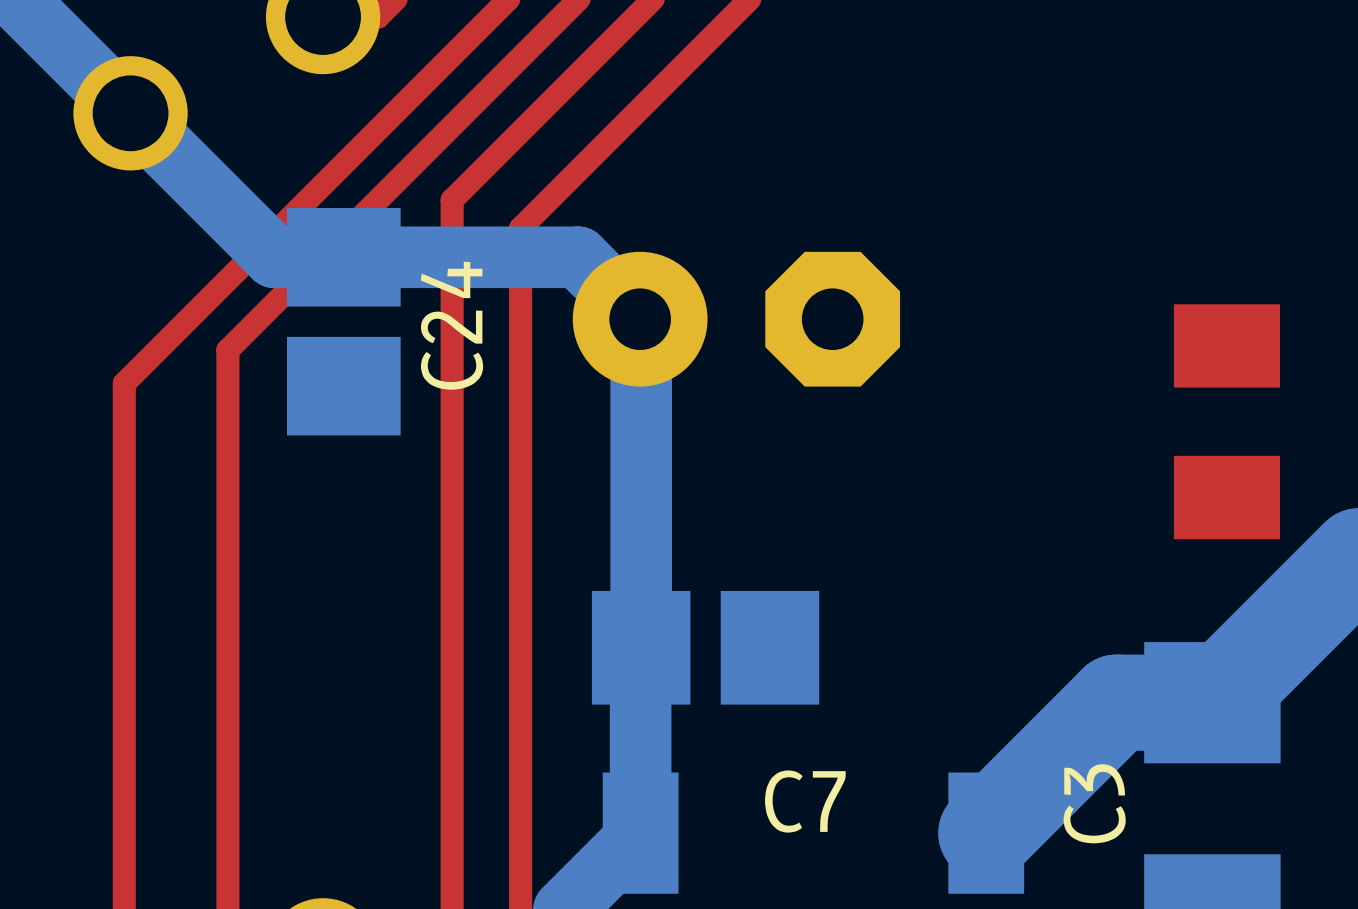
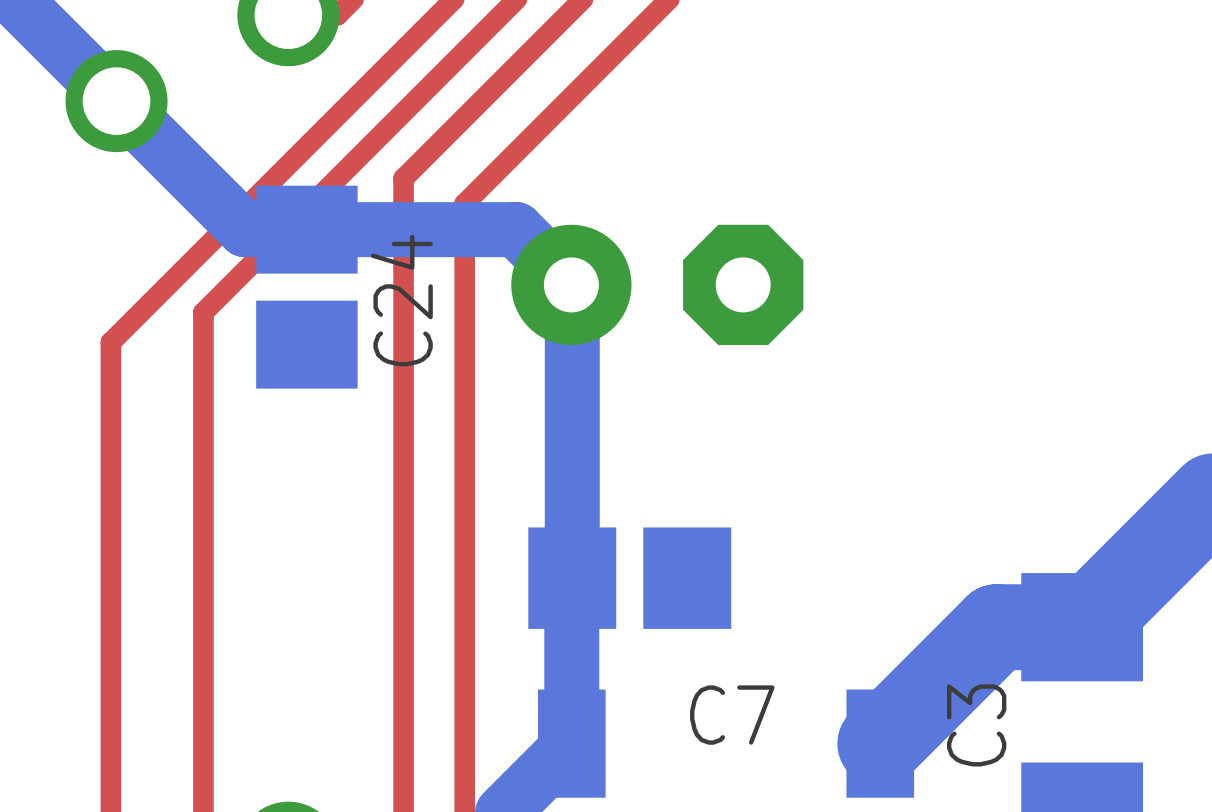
part: (1226, 421) -> none

